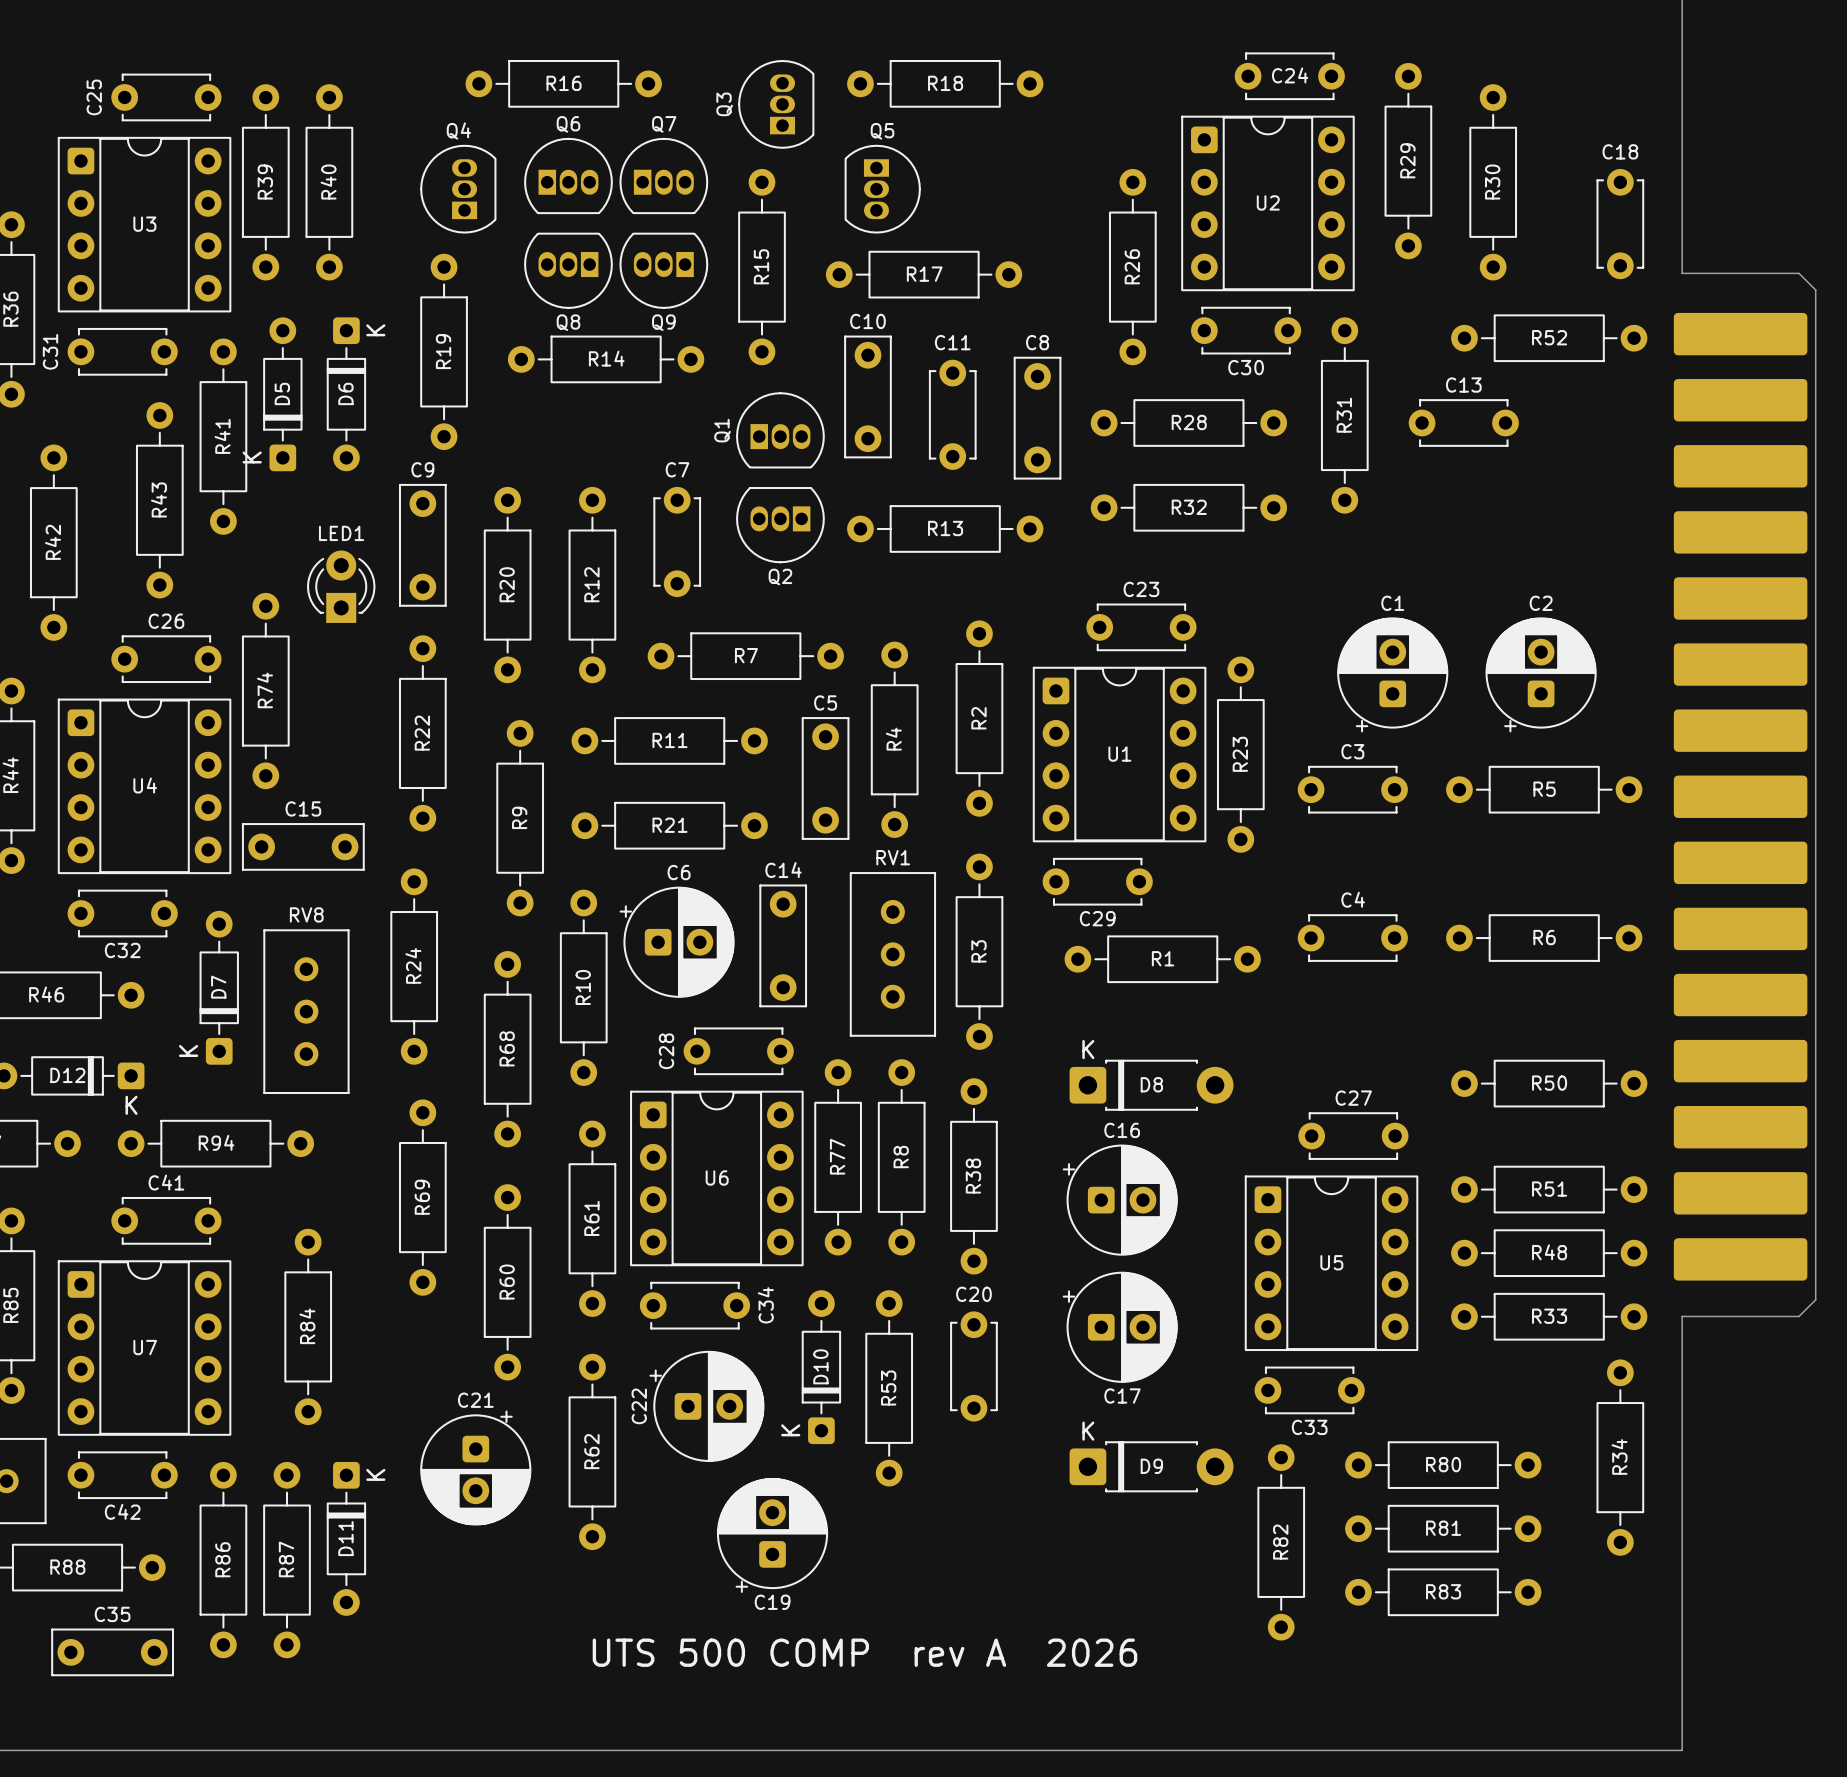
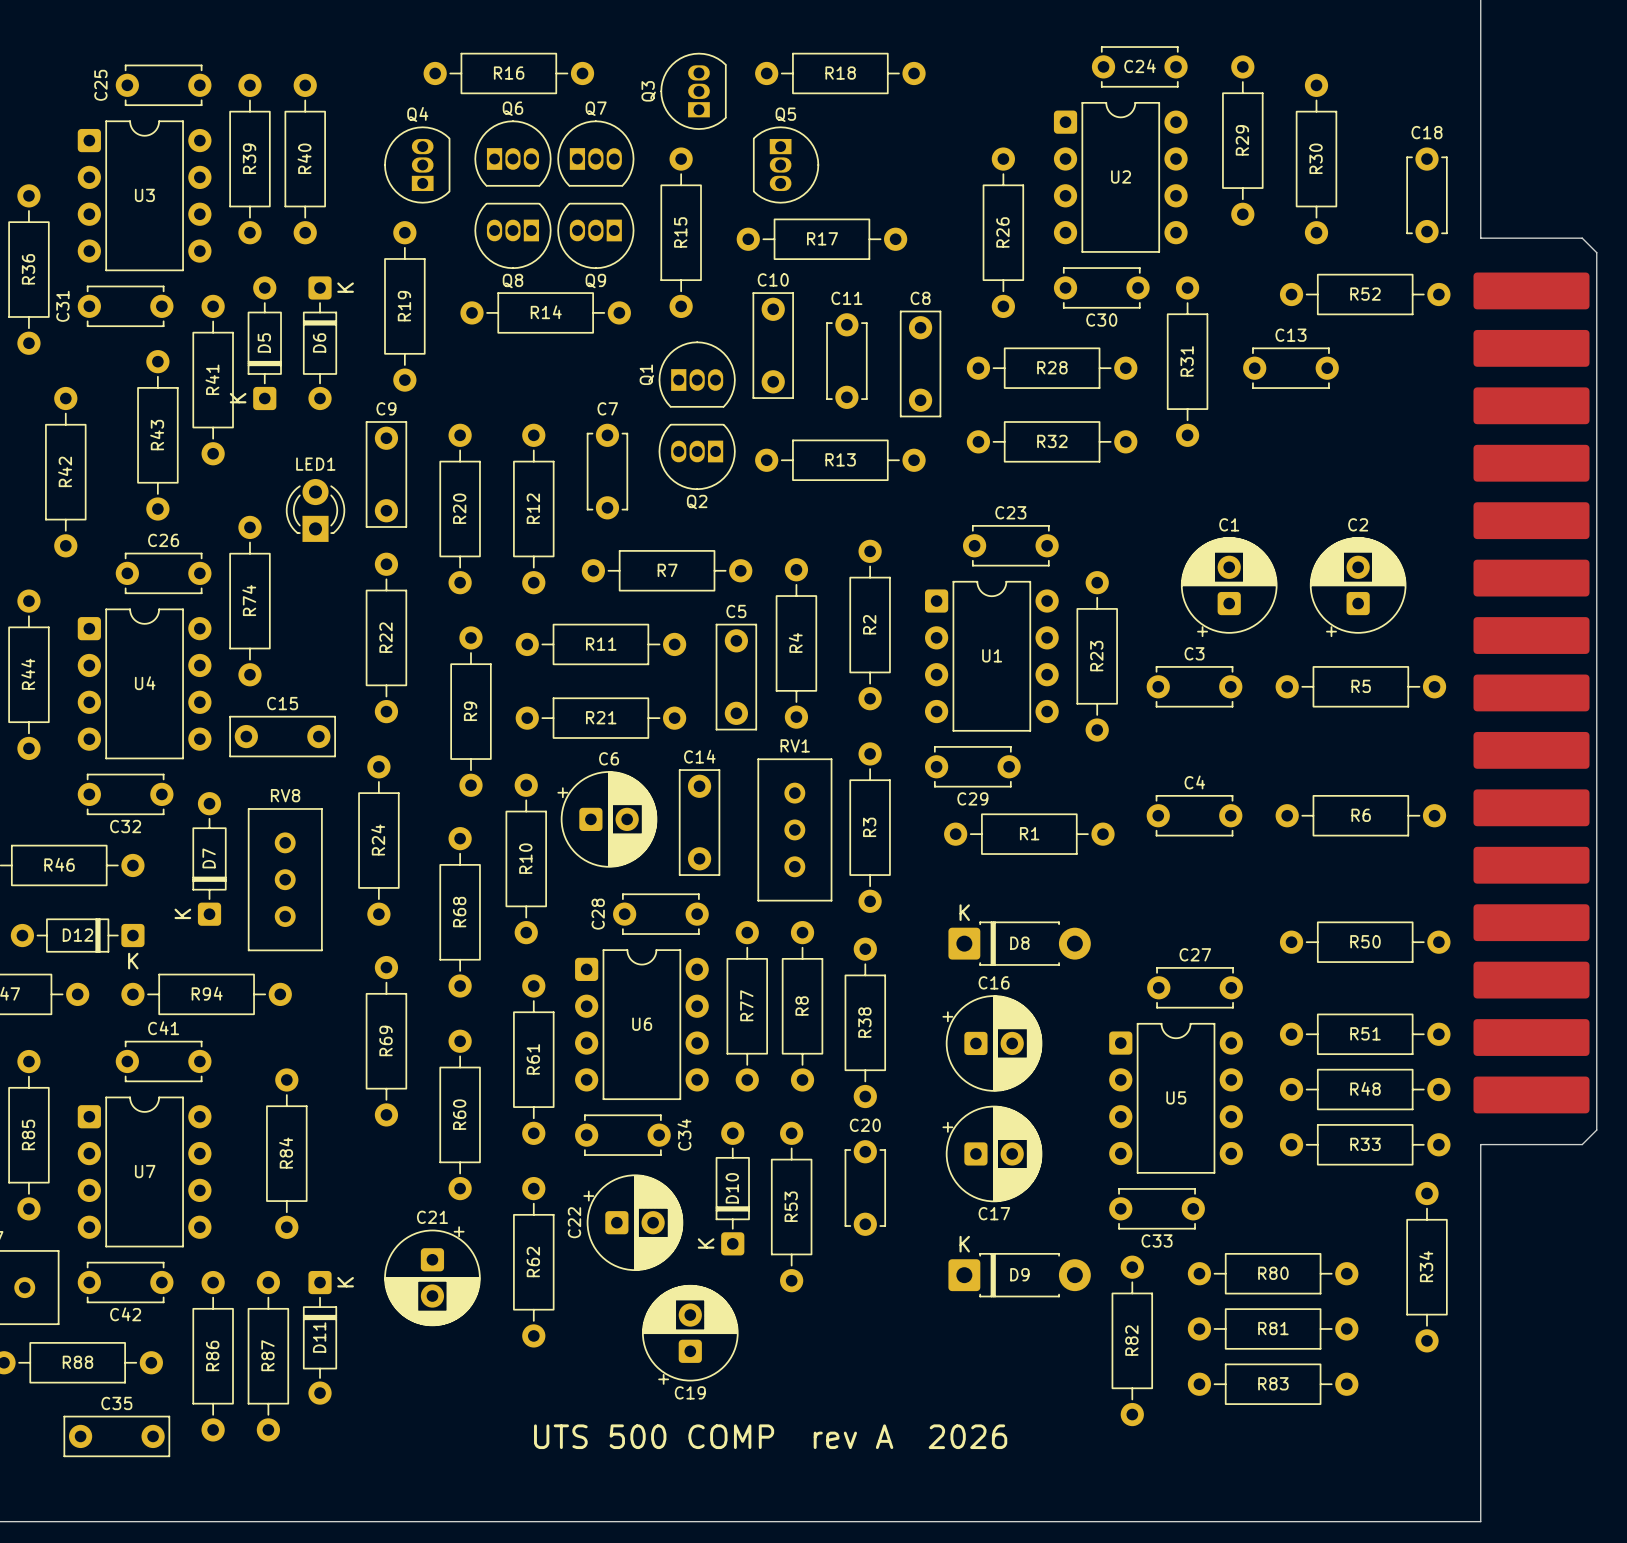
U2 footprint: [1181, 115, 1355, 292] -> [1053, 101, 1188, 253]
U3 footprint: [57, 136, 232, 313] -> [77, 120, 212, 272]
U1 footprint: [1032, 666, 1207, 843] -> [924, 580, 1059, 732]
U4 footprint: [57, 698, 232, 875] -> [77, 608, 212, 760]
U6 footprint: [630, 1090, 804, 1267] -> [575, 949, 709, 1101]
U5 footprint: [1244, 1175, 1419, 1352] -> [1109, 1022, 1243, 1174]
U7 footprint: [57, 1260, 232, 1436] -> [77, 1096, 212, 1248]

